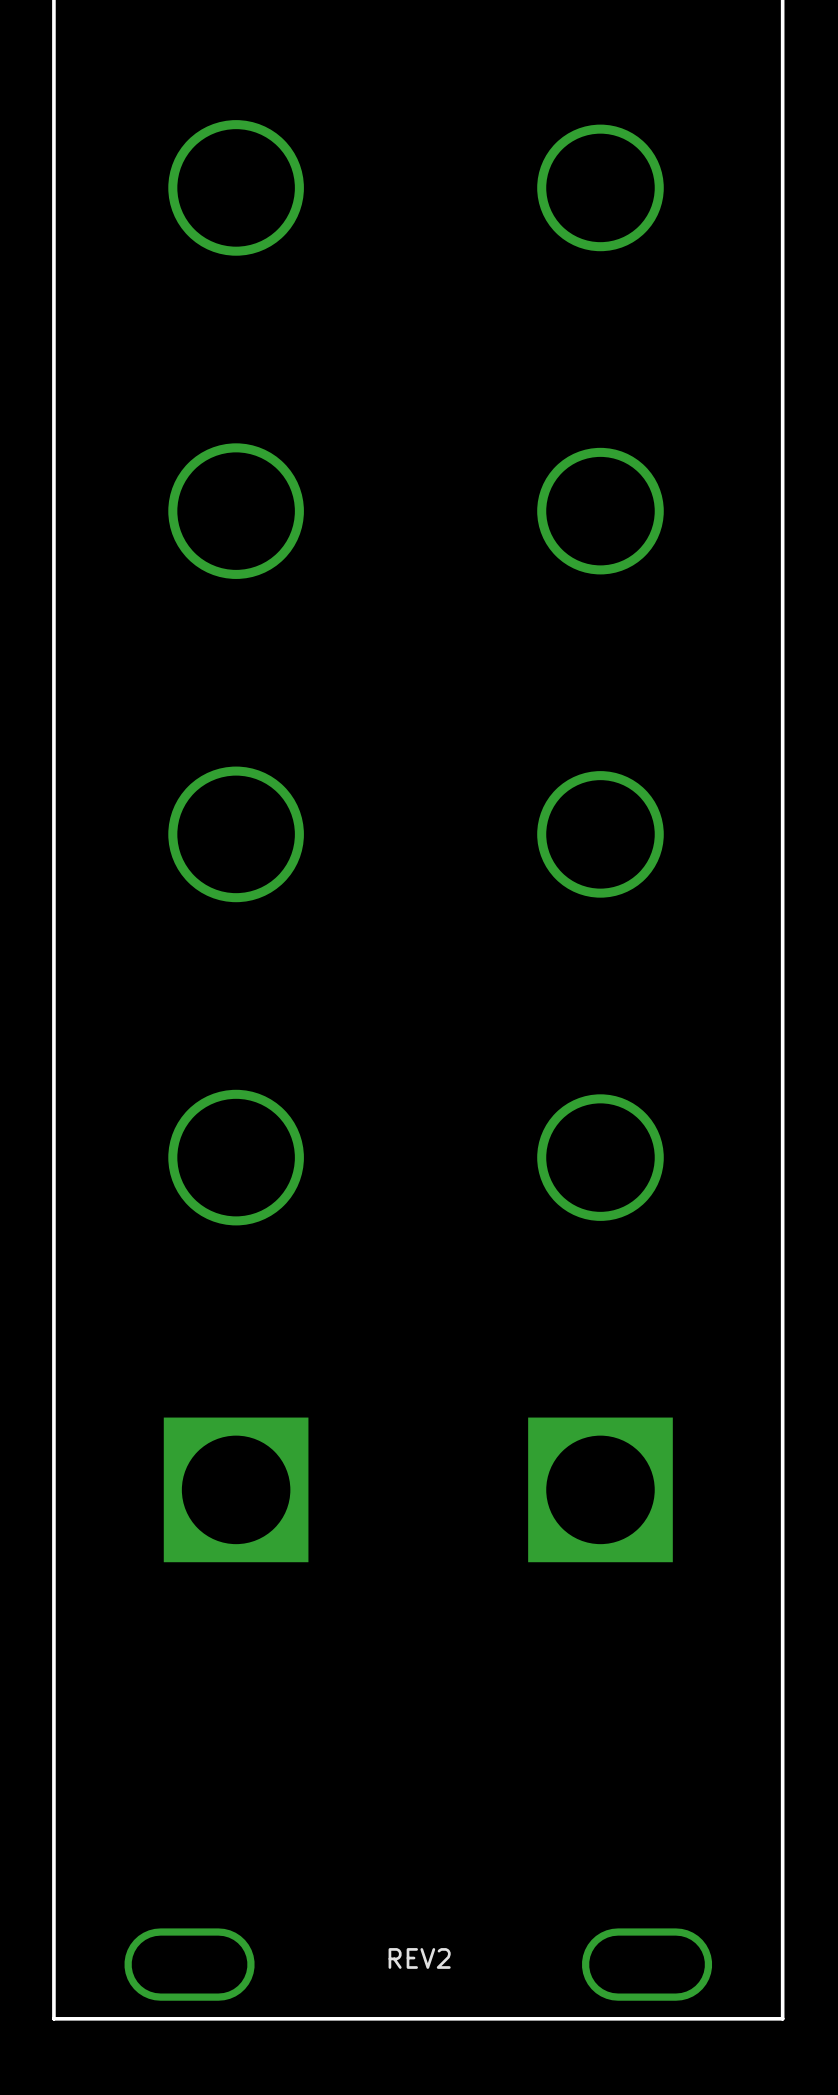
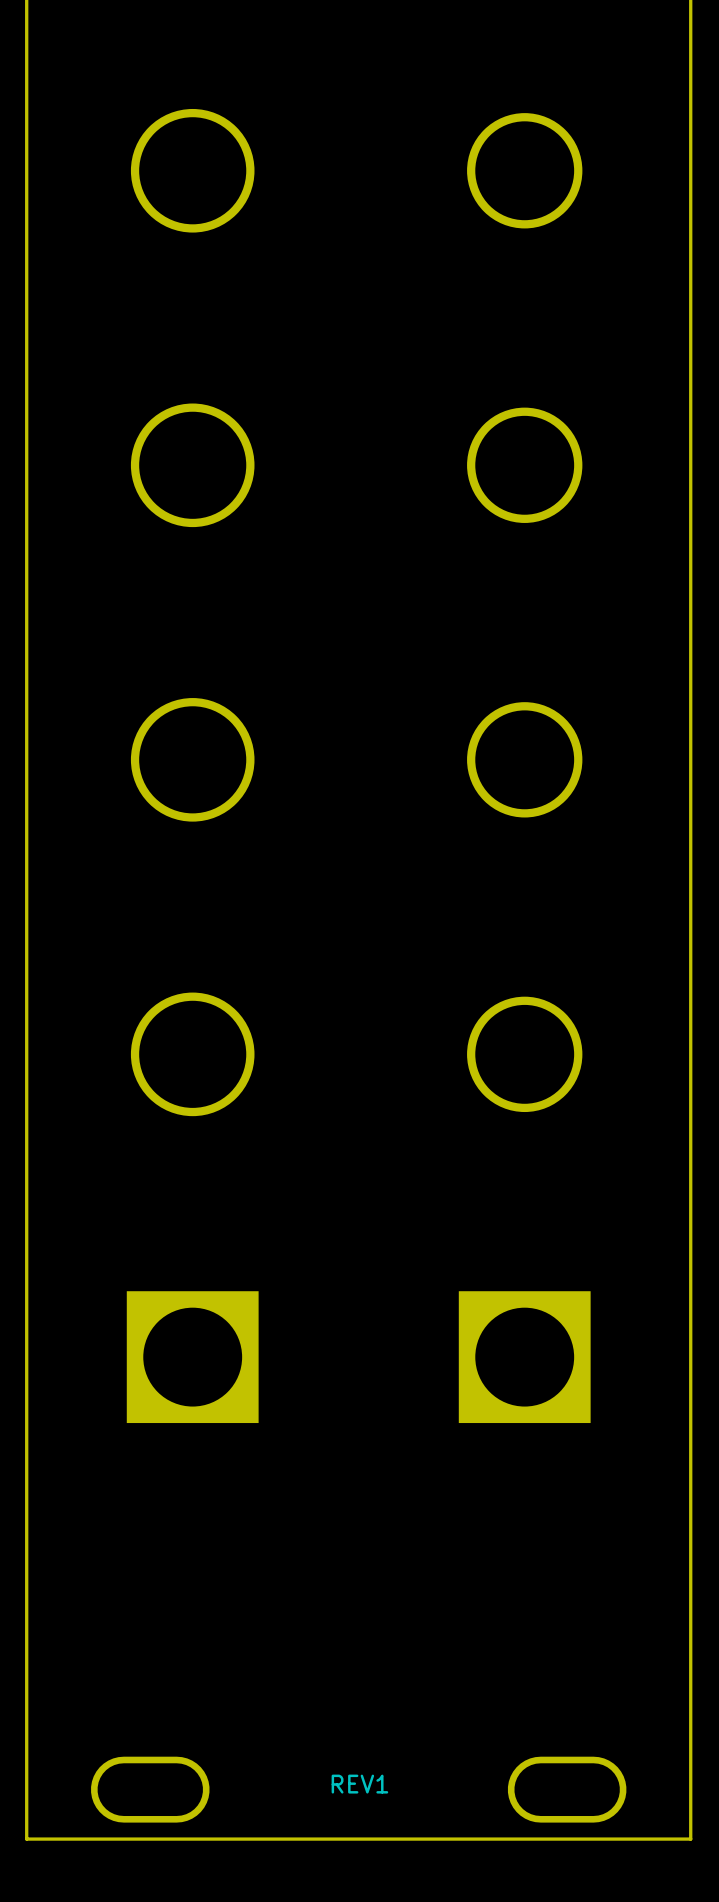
text: REV2 (419, 1958) -> REV1 (359, 1784)

